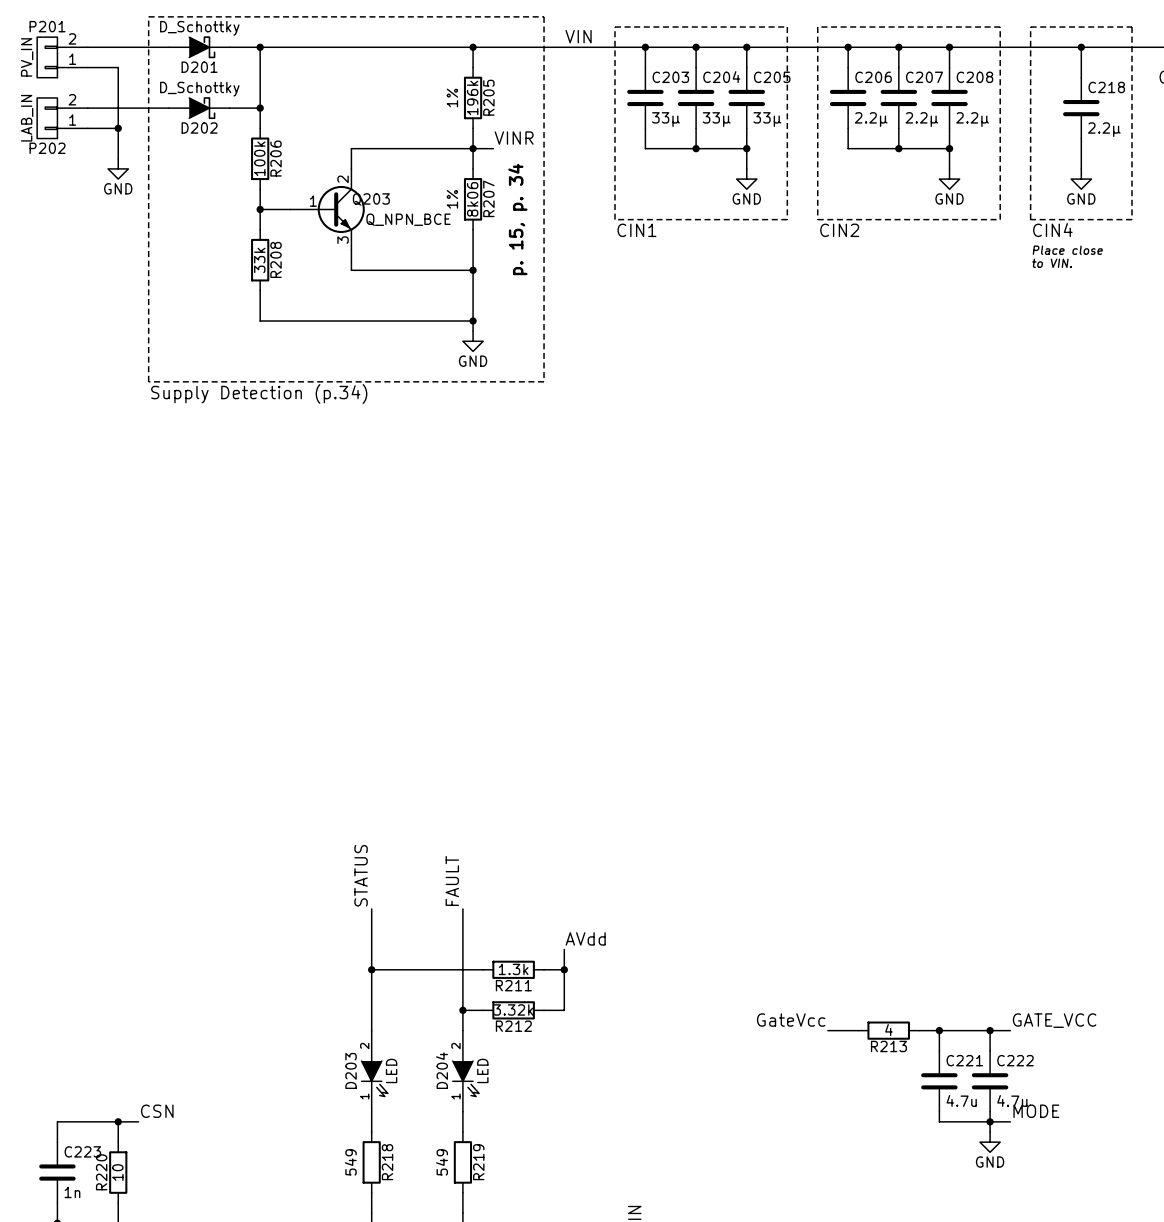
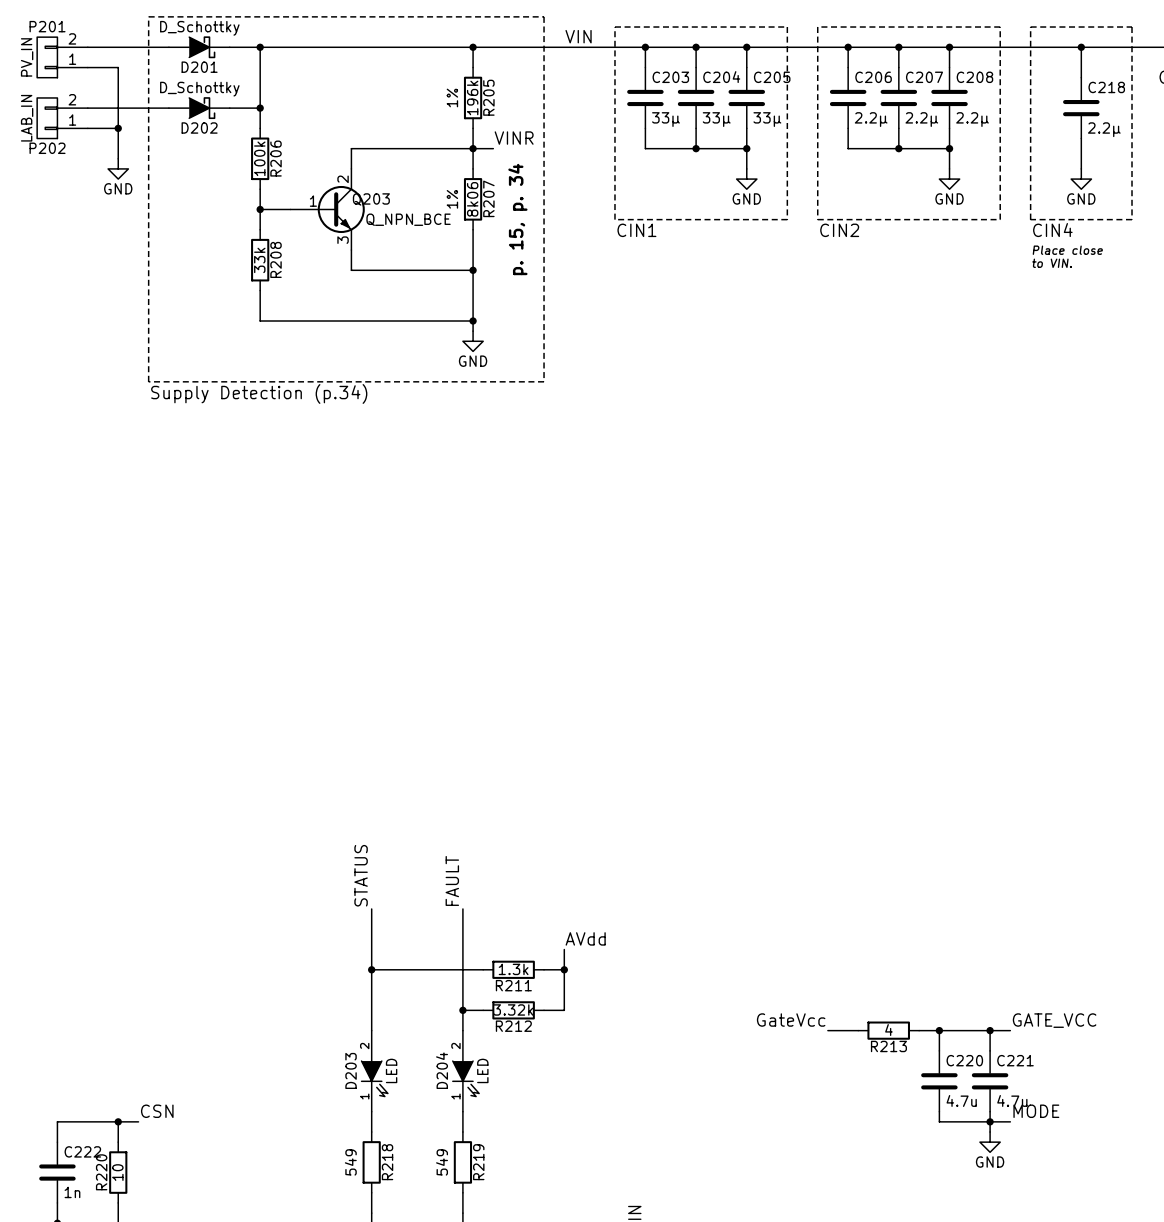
C221 name: C221 (964, 1060) -> C220 (964, 1060)
C222 name: C222 (1015, 1060) -> C221 (1015, 1060)
C223 name: C223 (82, 1151) -> C222 (82, 1151)

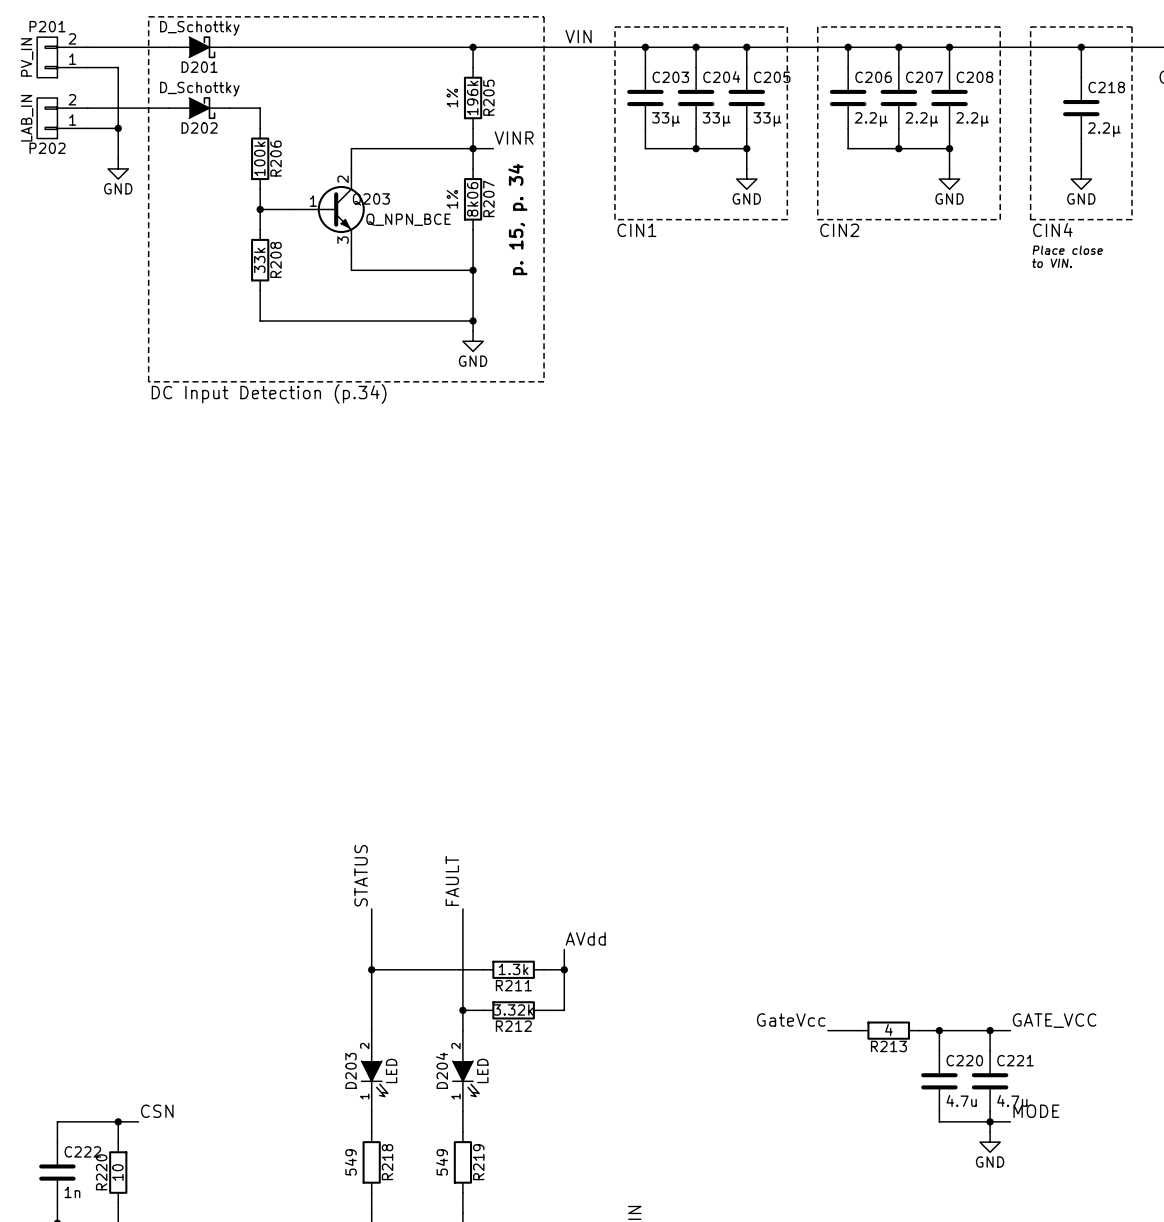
wire: (260, 47) (260, 108) -> none
junction: (260, 47) -> none
junction: (260, 108) -> none
text: Supply Detection (p.34) (259, 393) -> DC Input Detection (p.34) (269, 393)

